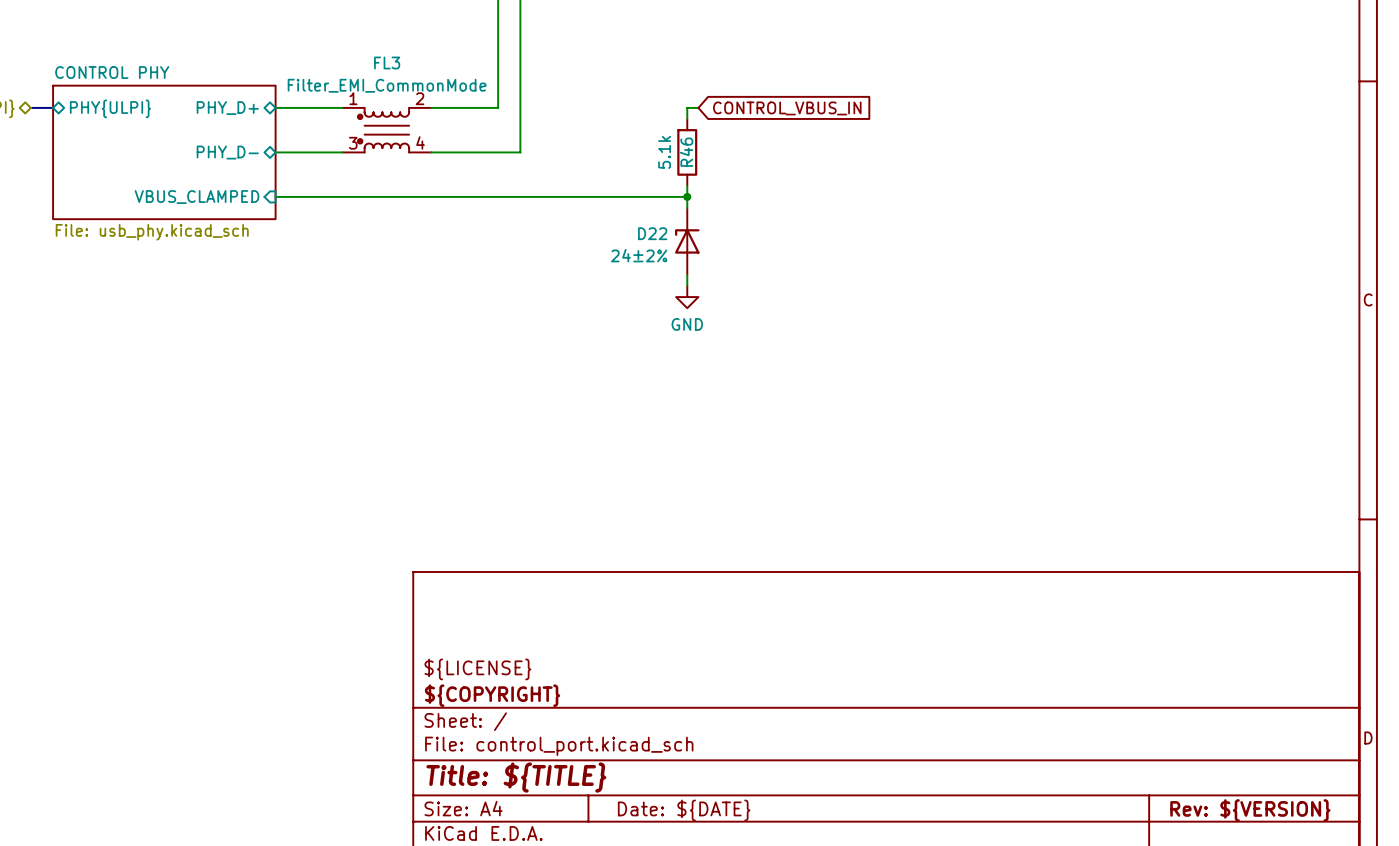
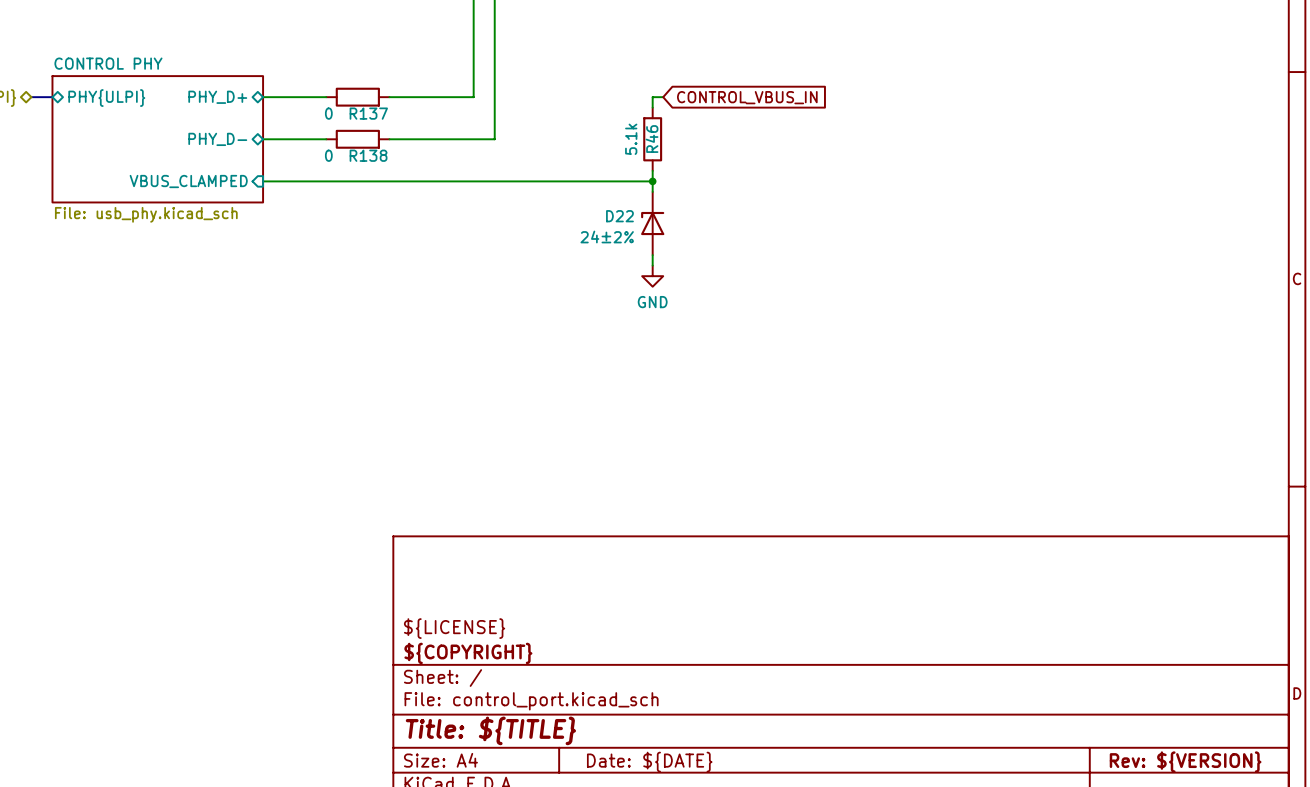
R137: none -> 0 (357, 97)
FL3: Filter_EMI_CommonMode (386, 130) -> none
R138: none -> 0 (357, 139)

